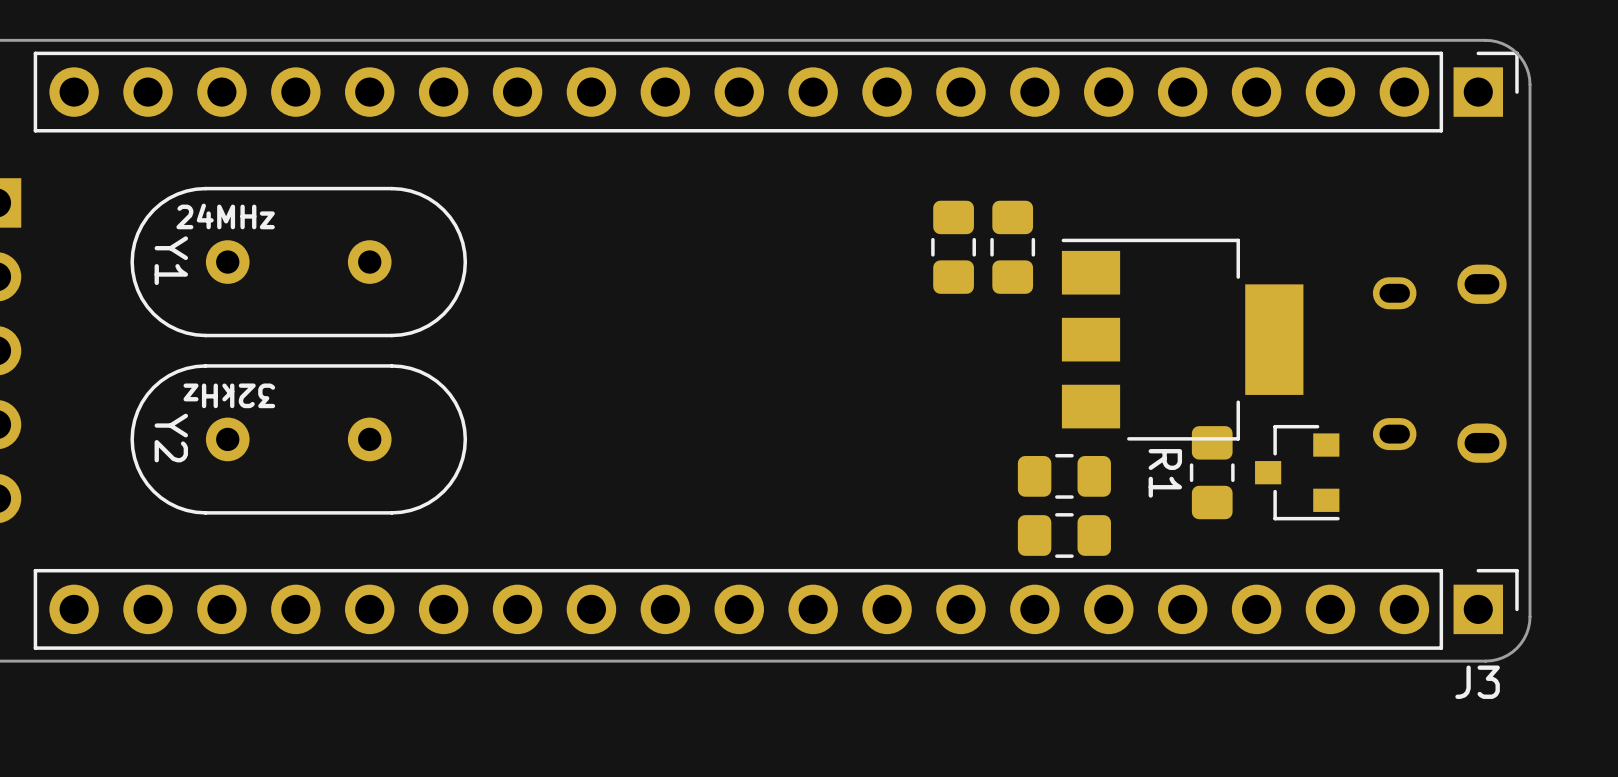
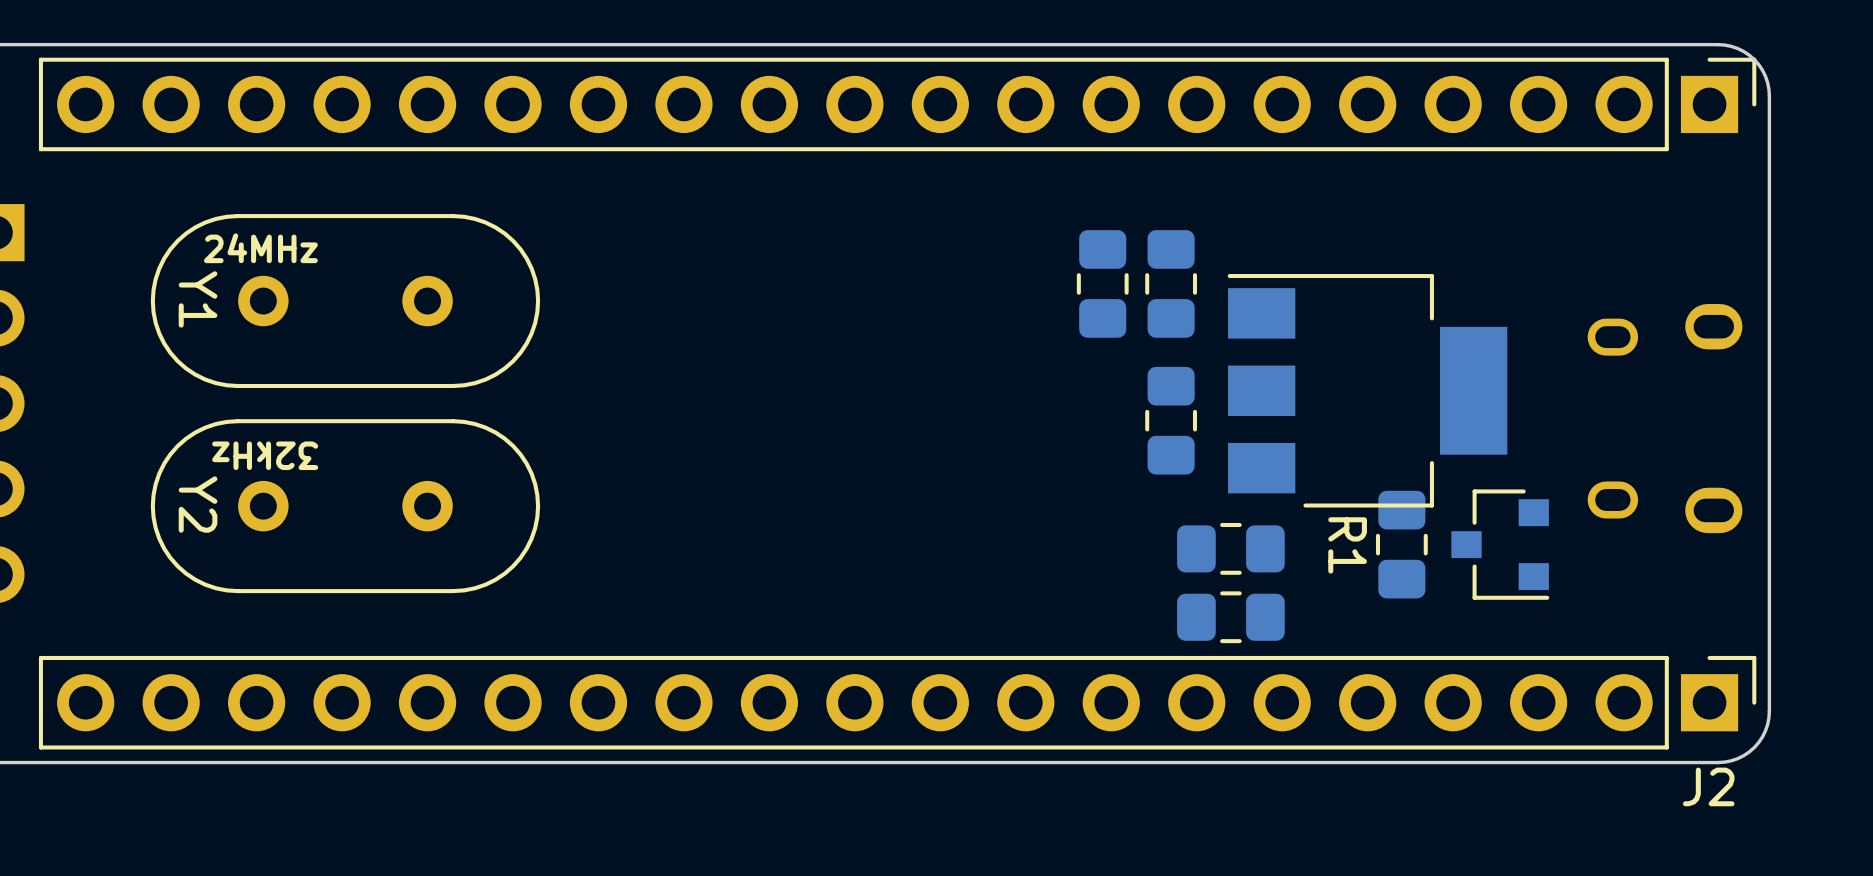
part: none -> (1171, 420)
J3 name: J3 (1477, 682) -> J2 (1708, 786)

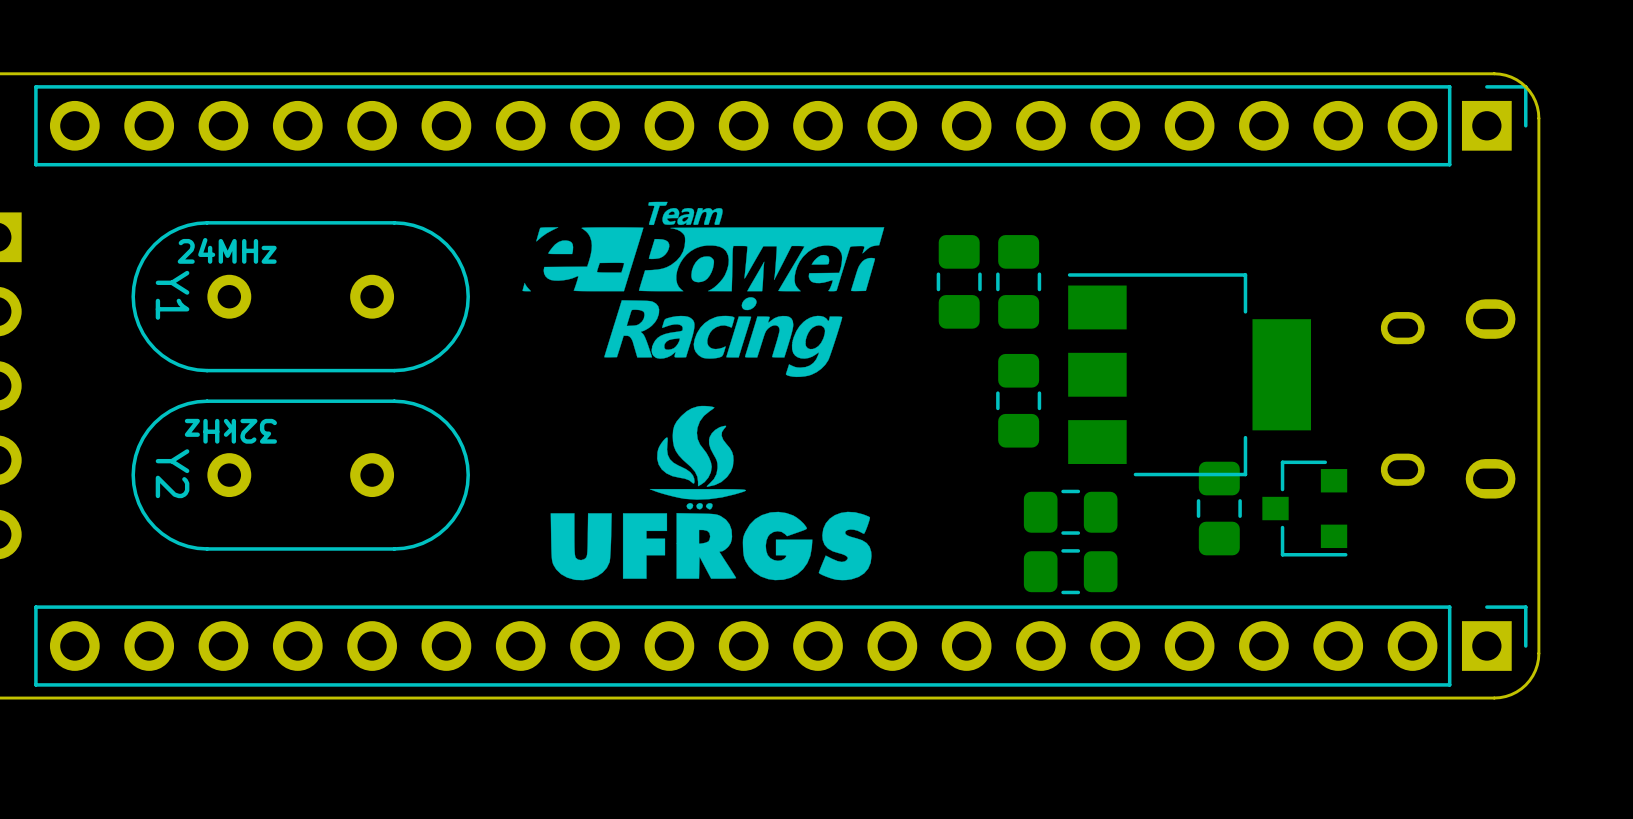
drawing: none -> [522, 201, 885, 581]
R1 name: R1 (1347, 545) -> none
J2 name: J2 (1708, 786) -> none

